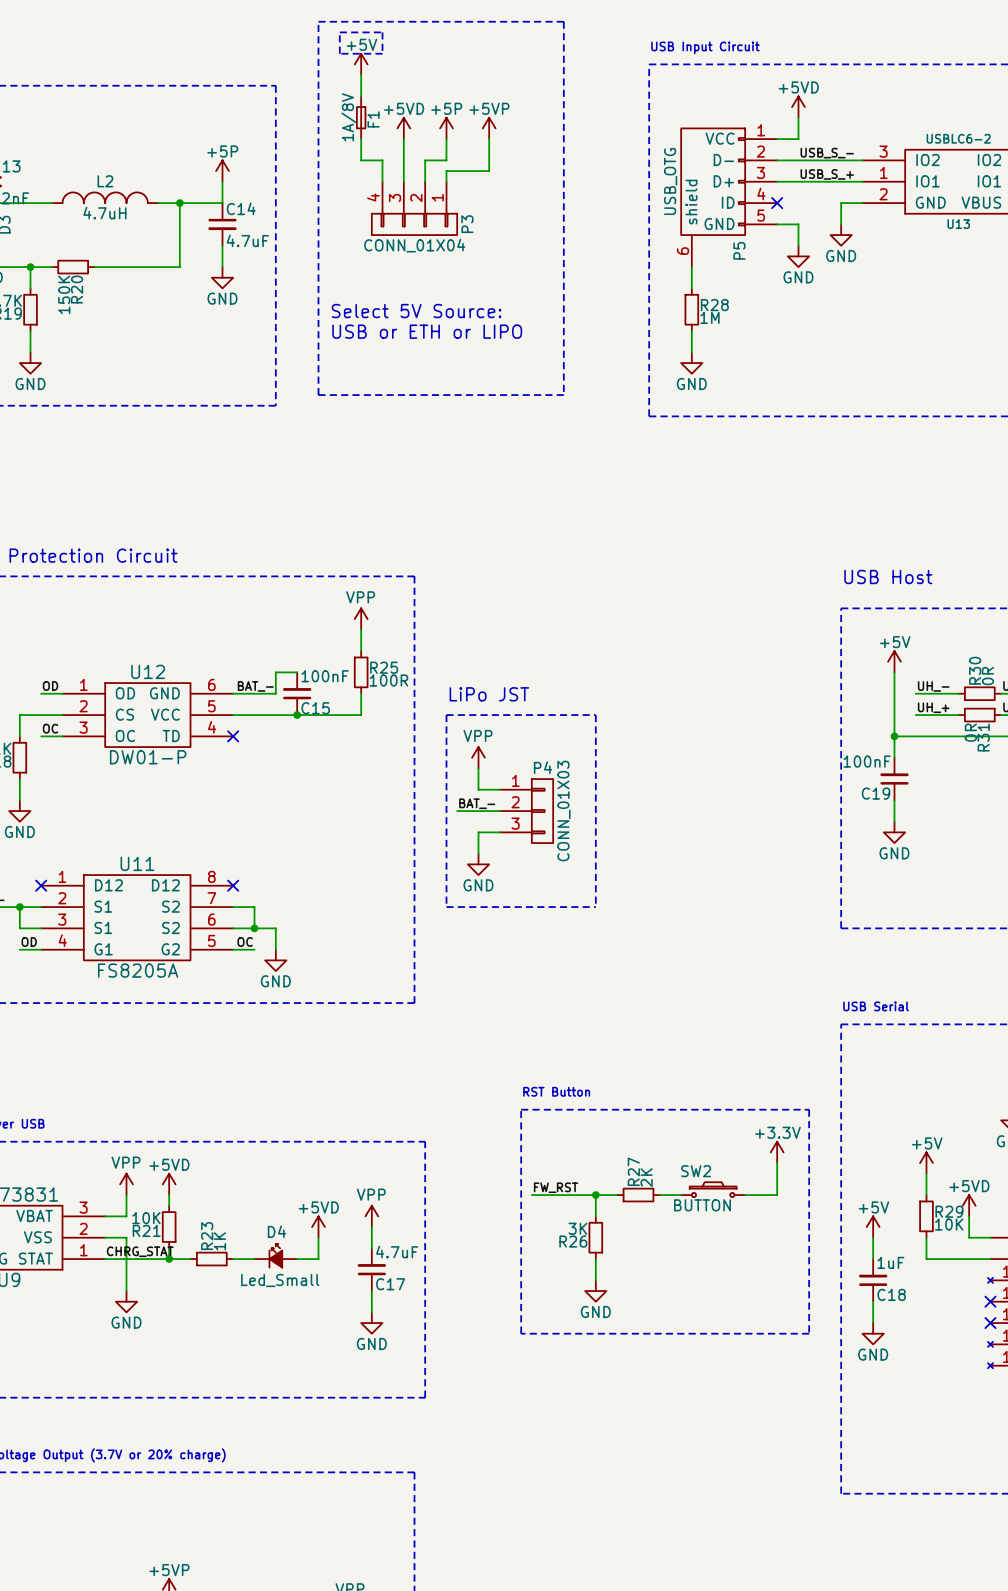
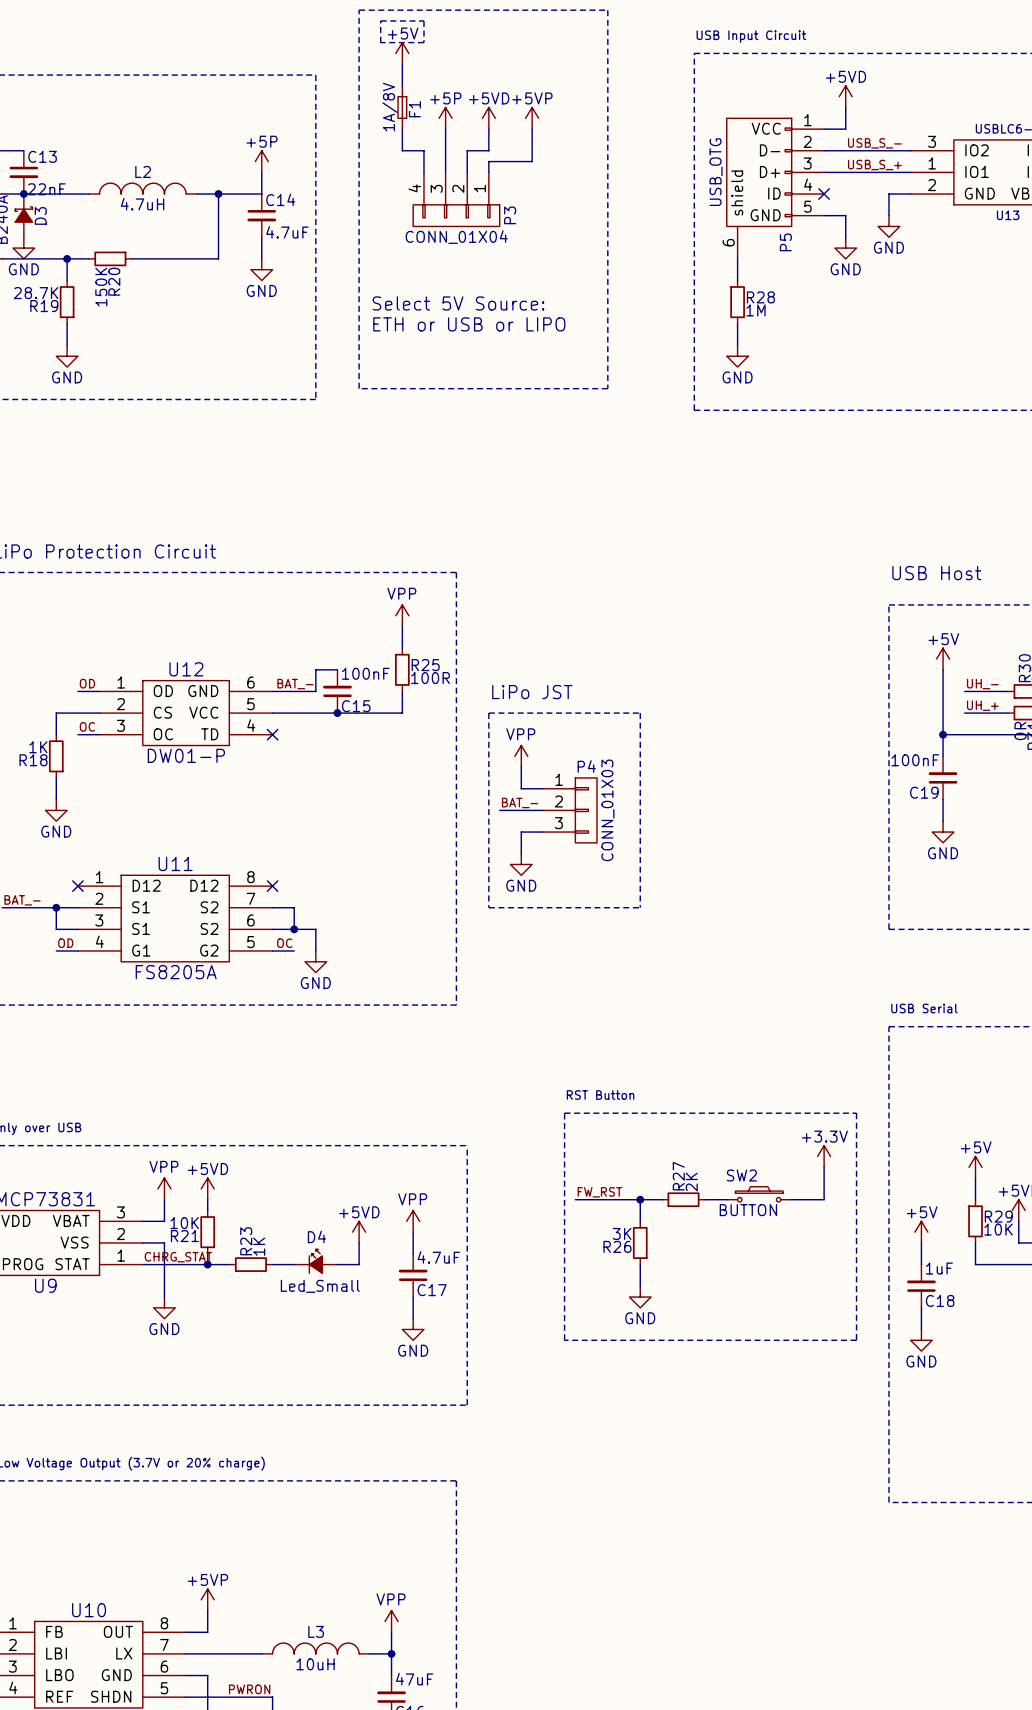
power symbol: +5VD (403, 128) -> +5P (445, 118)
power symbol: +5P (446, 128) -> +5VD (488, 118)
text: USB or ETH or LIPO (427, 331) -> ETH or USB or LIPO (469, 324)

